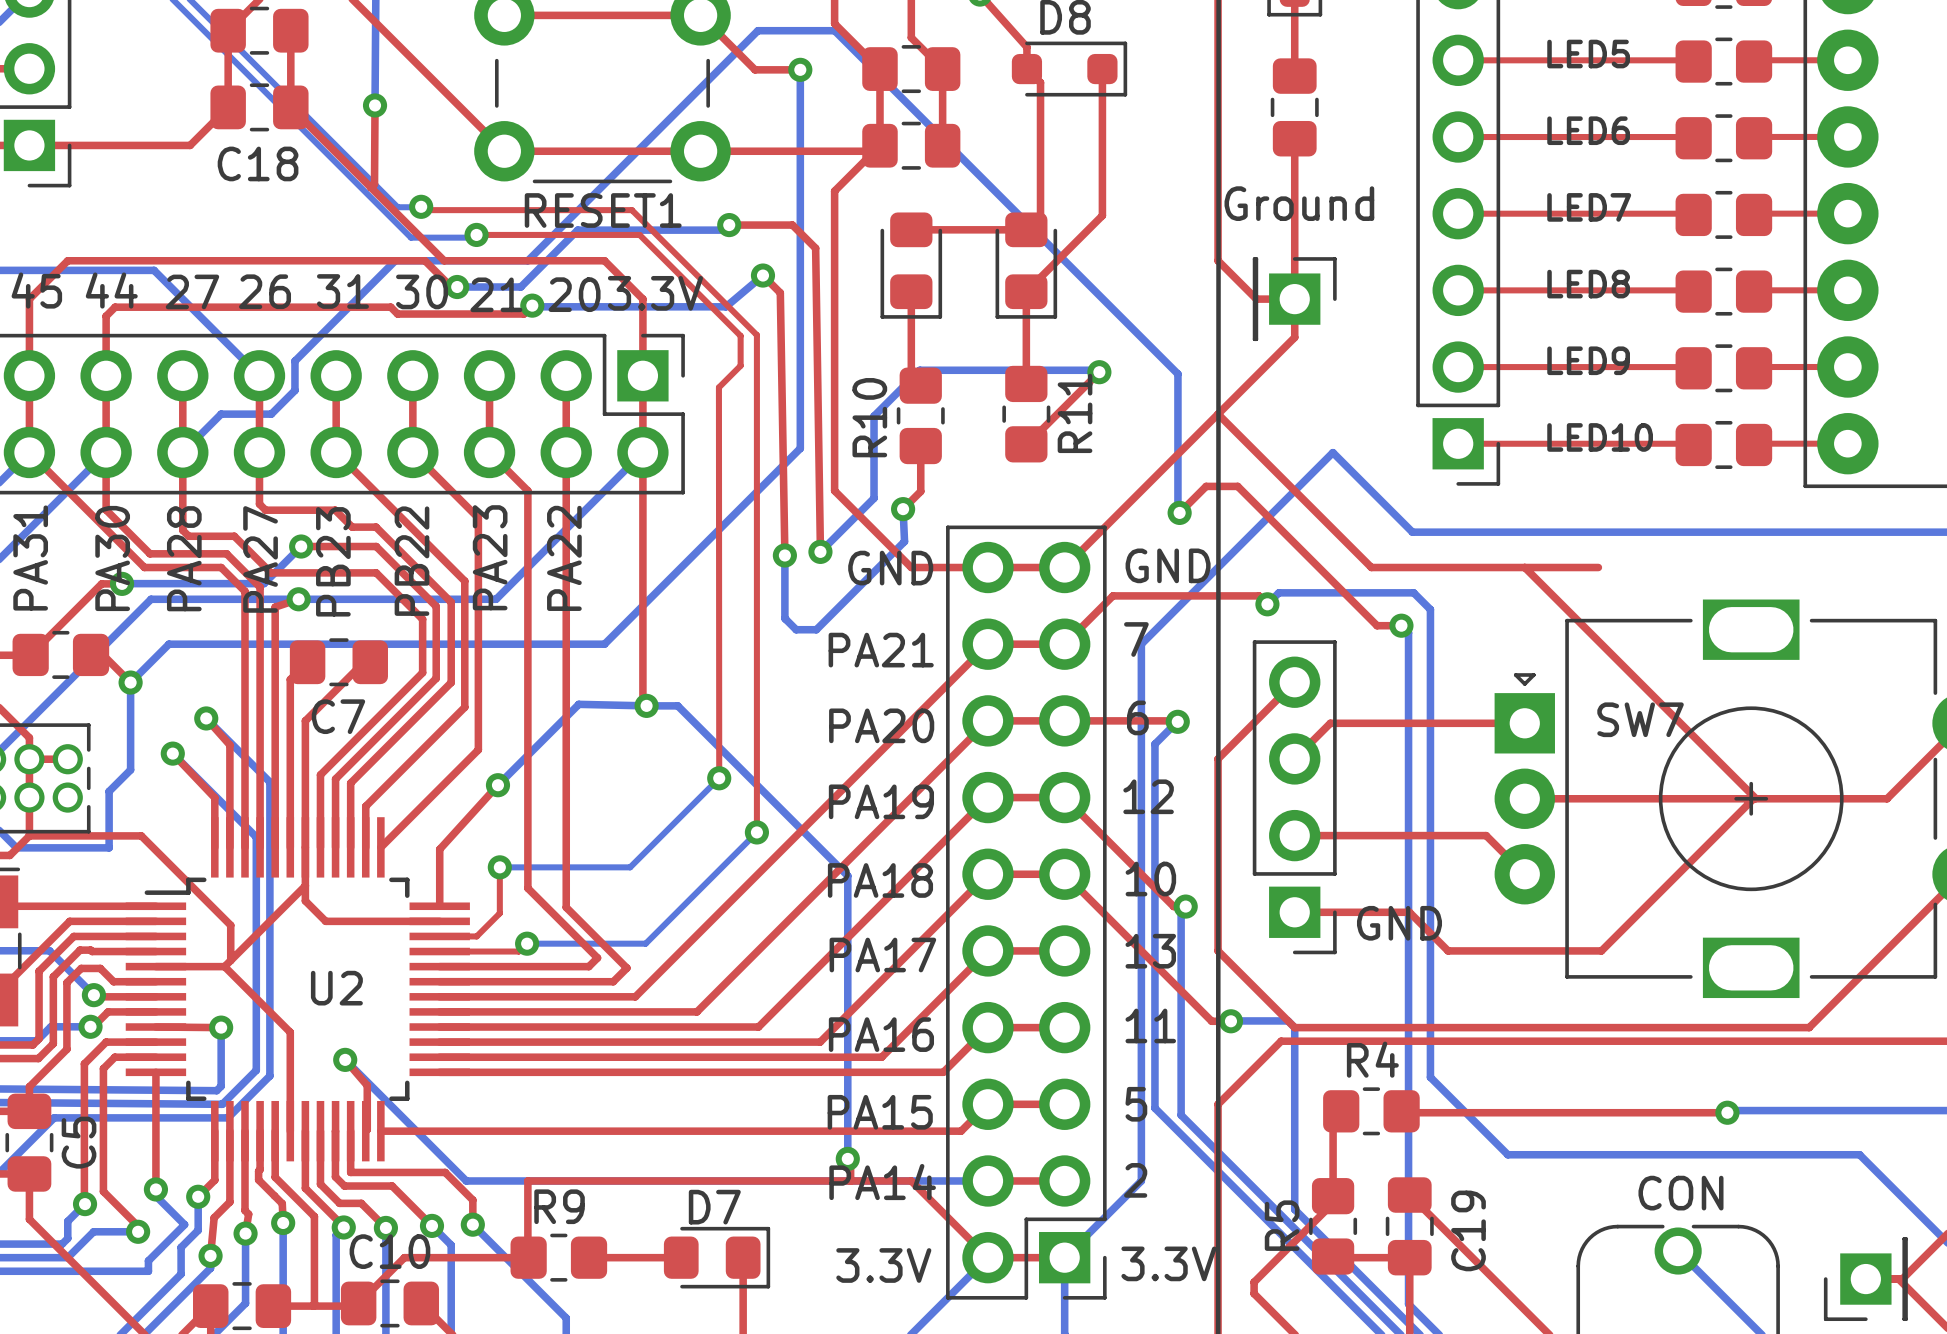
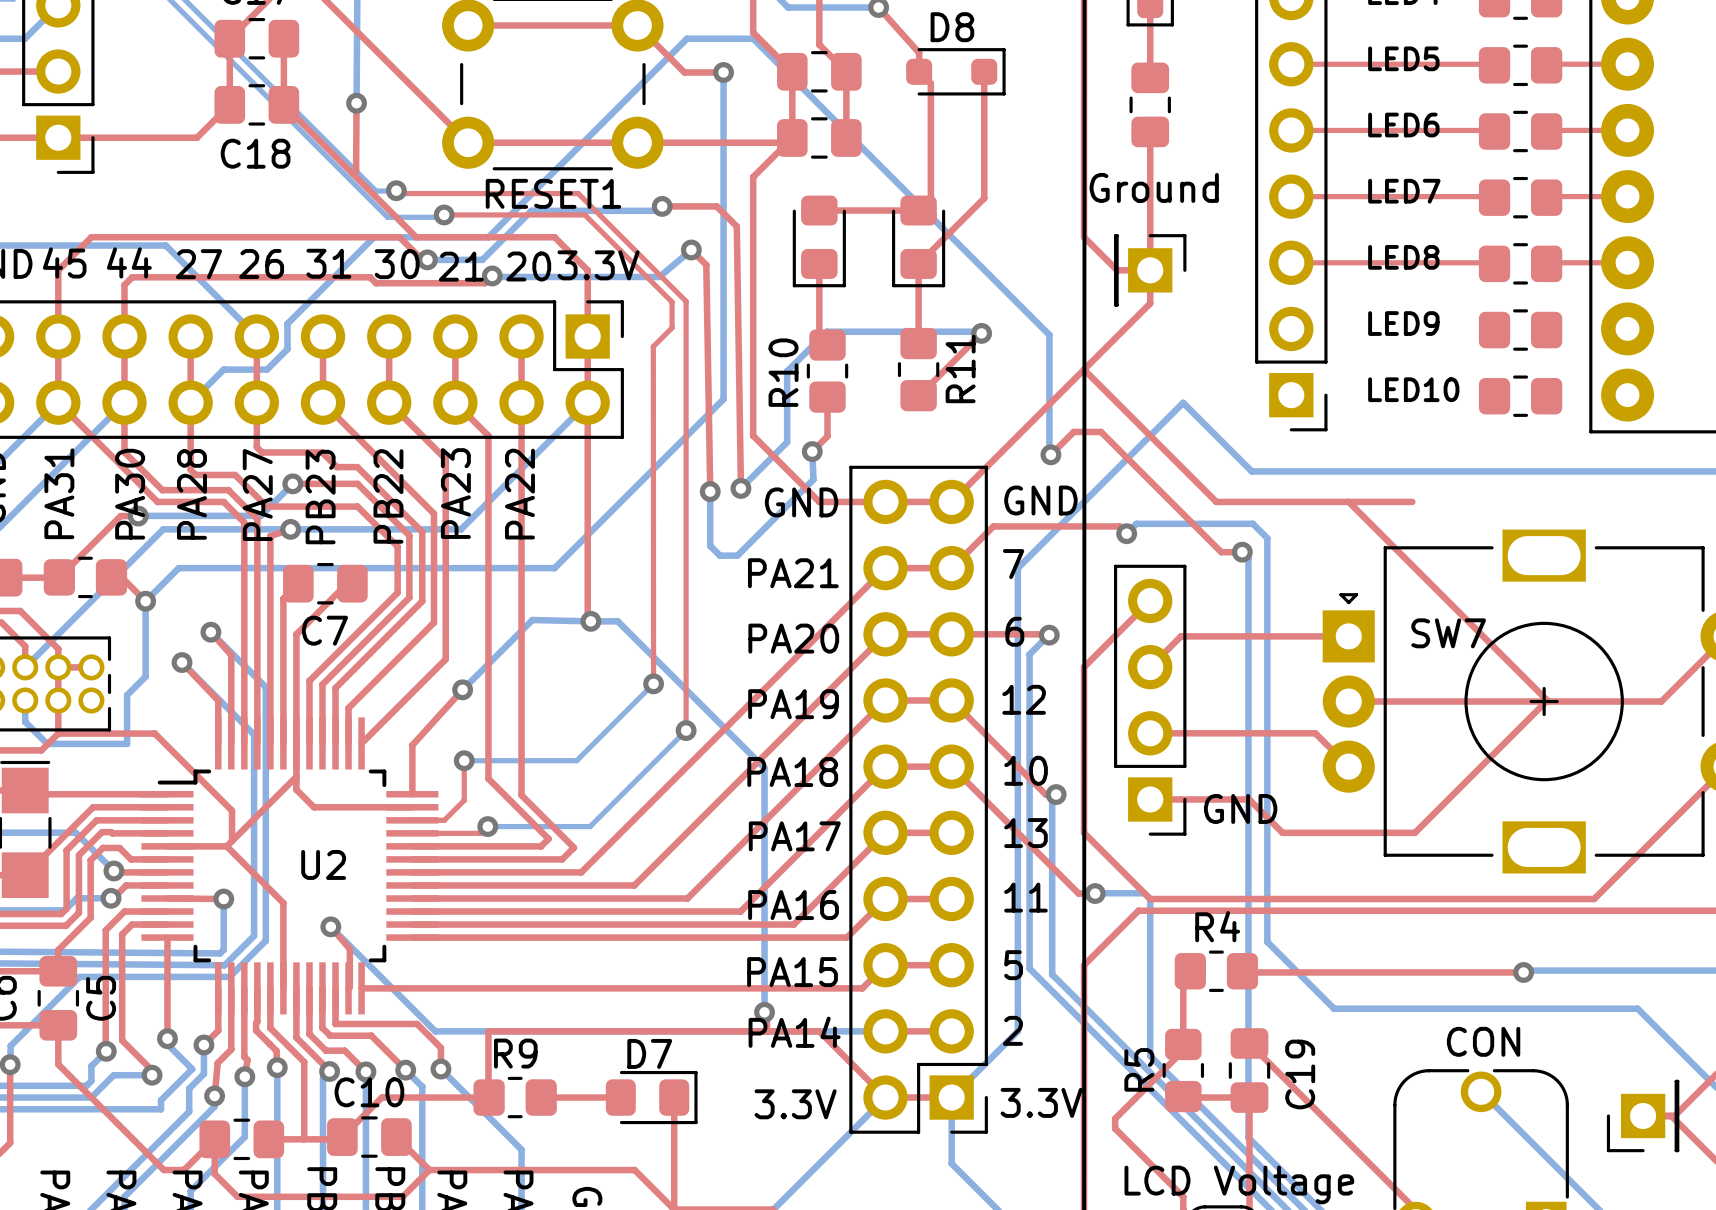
top track: (1458, 367) (1693, 368) -> none
top track: (1847, 367) (1754, 368) -> none
top track: (1458, 443) (1693, 444) -> none
top track: (1847, 443) (1754, 444) -> none

